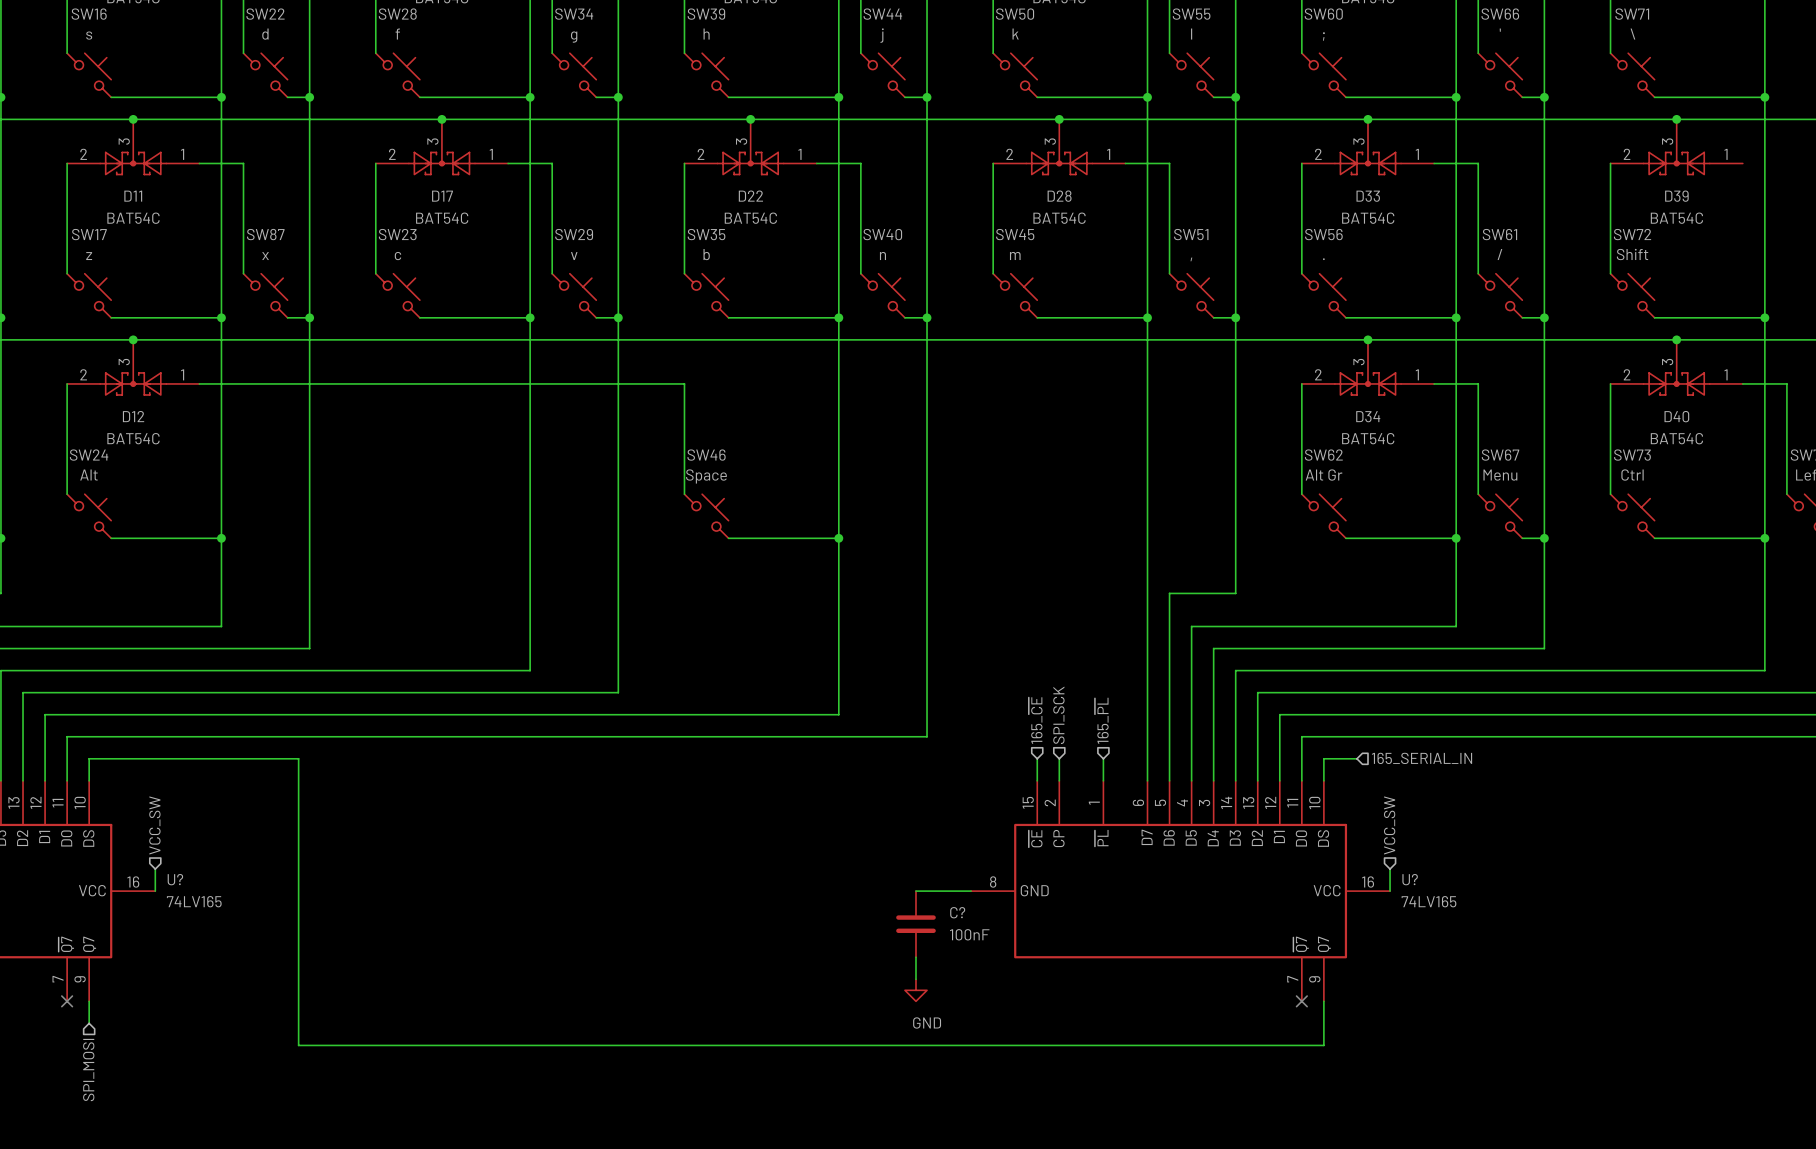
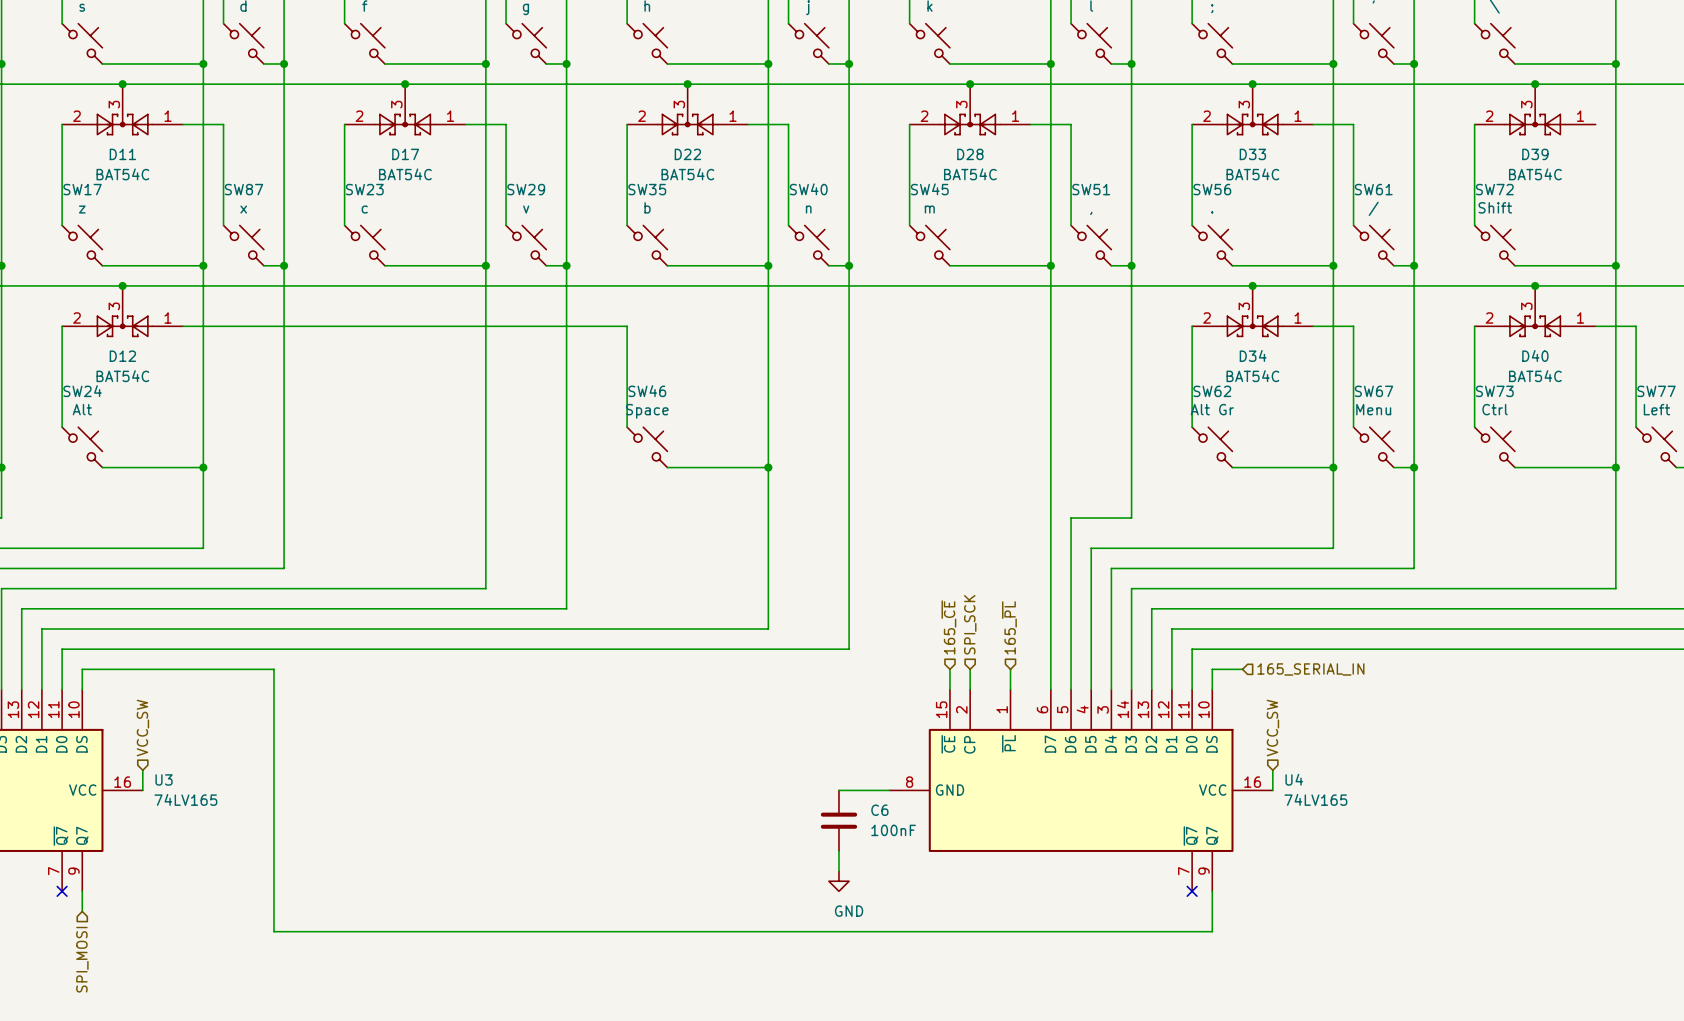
U? name: U? (175, 879) -> U3 (164, 779)
U? name: U? (1410, 879) -> U4 (1294, 779)
C? name: C? (957, 912) -> C6 (879, 810)

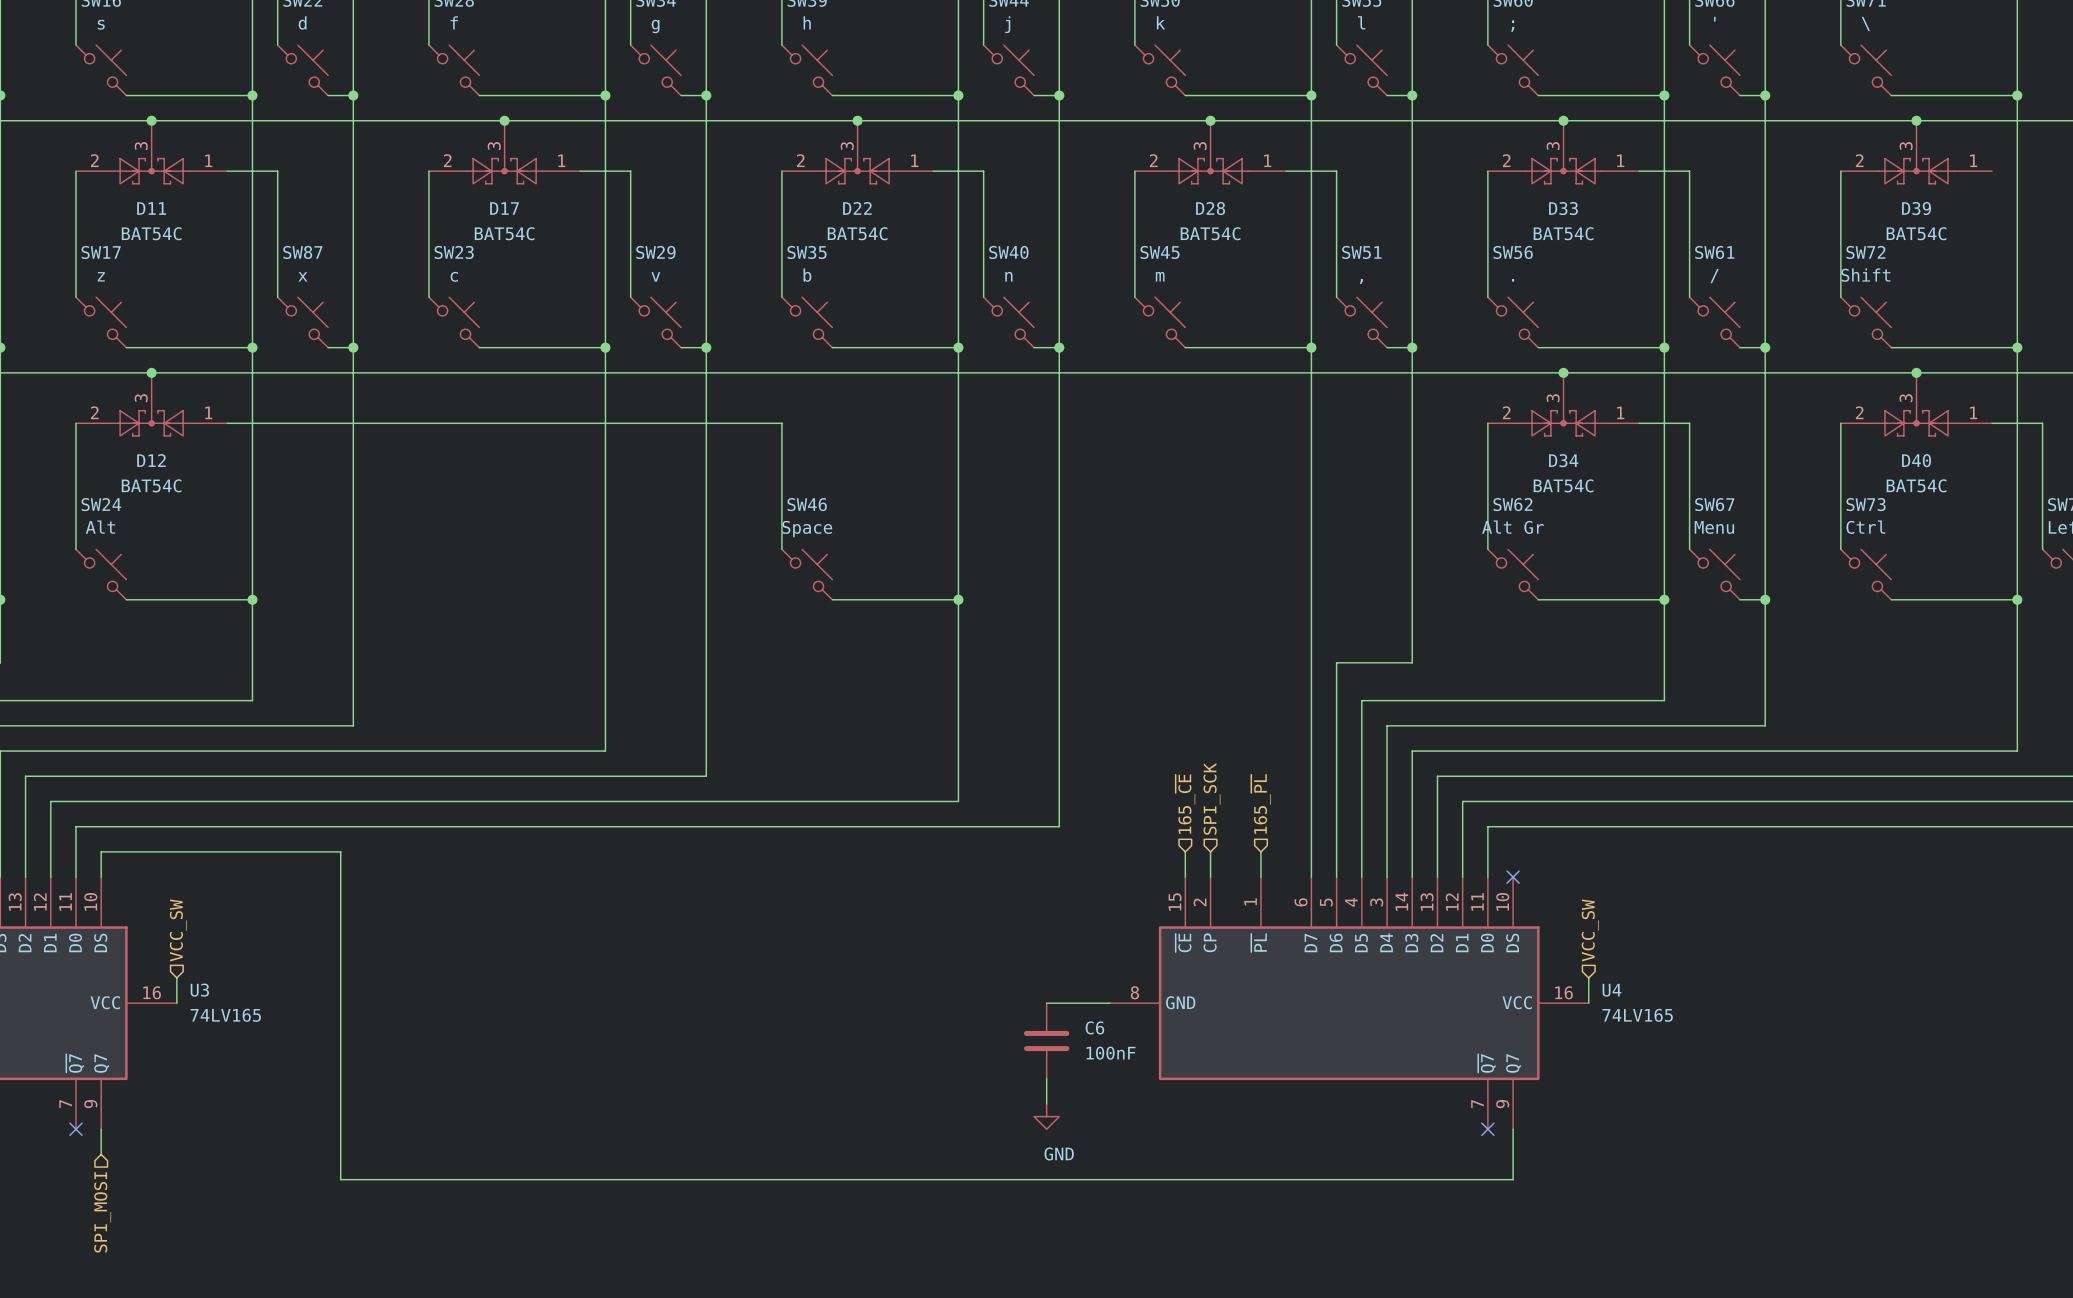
wire: (1242, 669) (1212, 669) (1212, 689) -> none
hierarchical label: 165_SERIAL_IN (1310, 669) -> none
no-connect mark: none -> (1513, 877)

